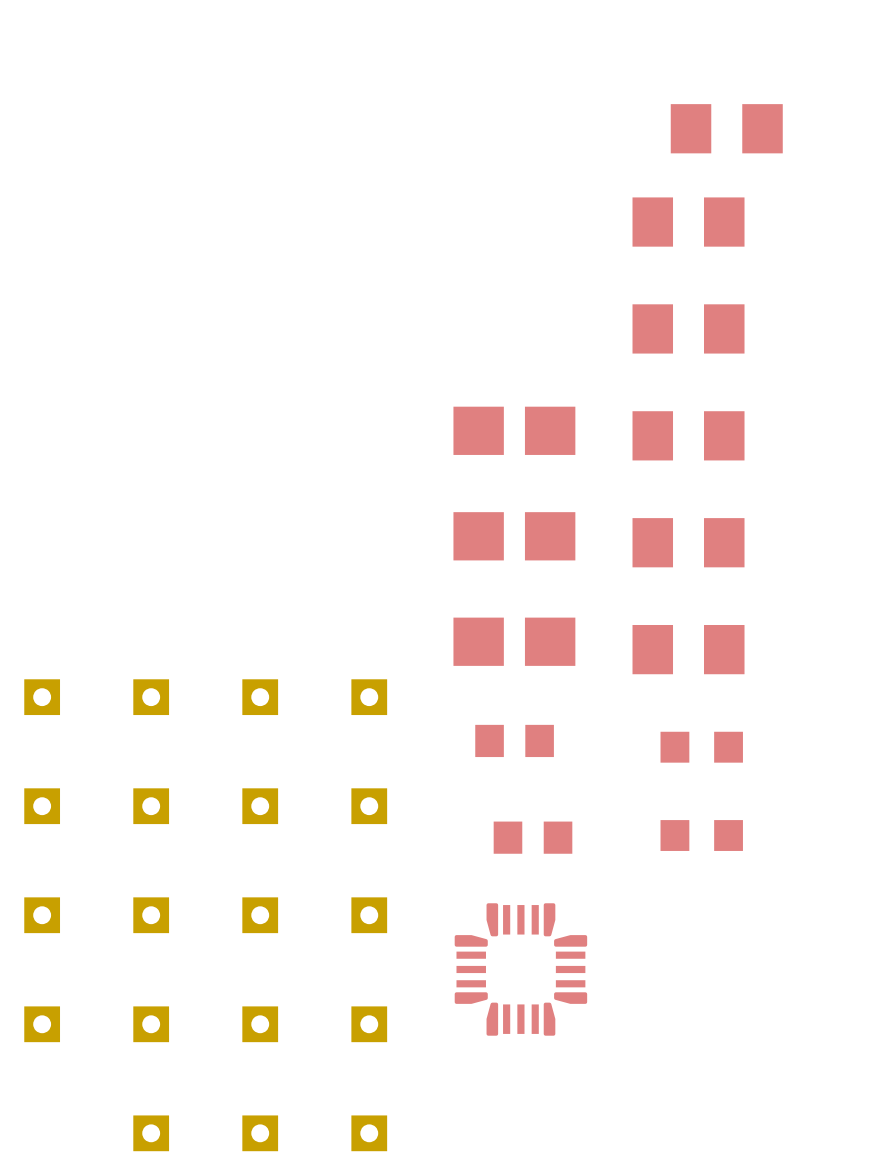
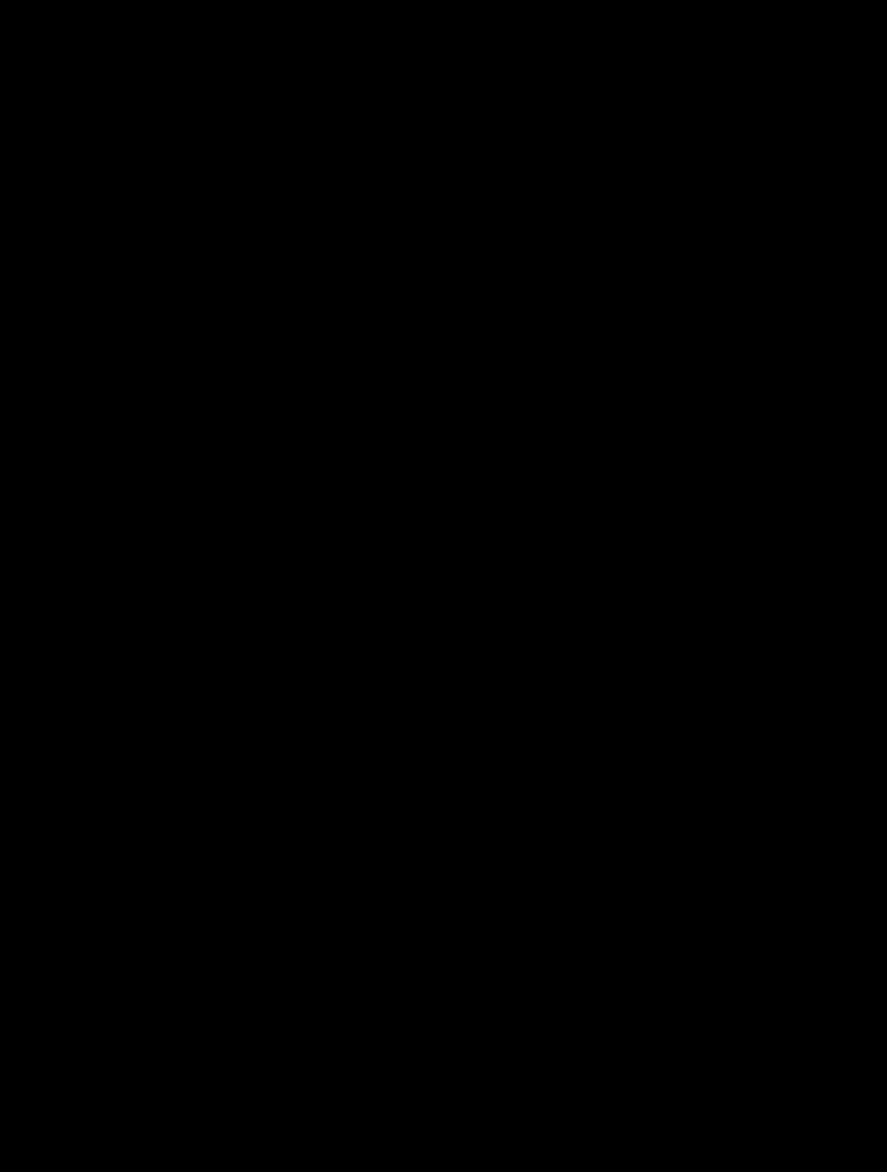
part: (726, 128) -> none
part: (688, 222) -> none
part: (688, 328) -> none
part: (514, 430) -> none
part: (688, 435) -> none
part: (514, 536) -> none
part: (688, 542) -> none
part: (514, 641) -> none
part: (688, 649) -> none
part: (42, 697) -> none
part: (151, 697) -> none
part: (260, 697) -> none
part: (369, 697) -> none
part: (514, 740) -> none
part: (701, 747) -> none
part: (42, 806) -> none
part: (151, 806) -> none
part: (260, 806) -> none
part: (369, 806) -> none
part: (701, 835) -> none
part: (532, 837) -> none
part: (42, 915) -> none
part: (151, 915) -> none
part: (260, 915) -> none
part: (369, 915) -> none
part: (520, 969) -> none
part: (42, 1024) -> none
part: (151, 1024) -> none
part: (260, 1024) -> none
part: (369, 1024) -> none
part: (151, 1133) -> none
part: (260, 1133) -> none
part: (369, 1133) -> none

